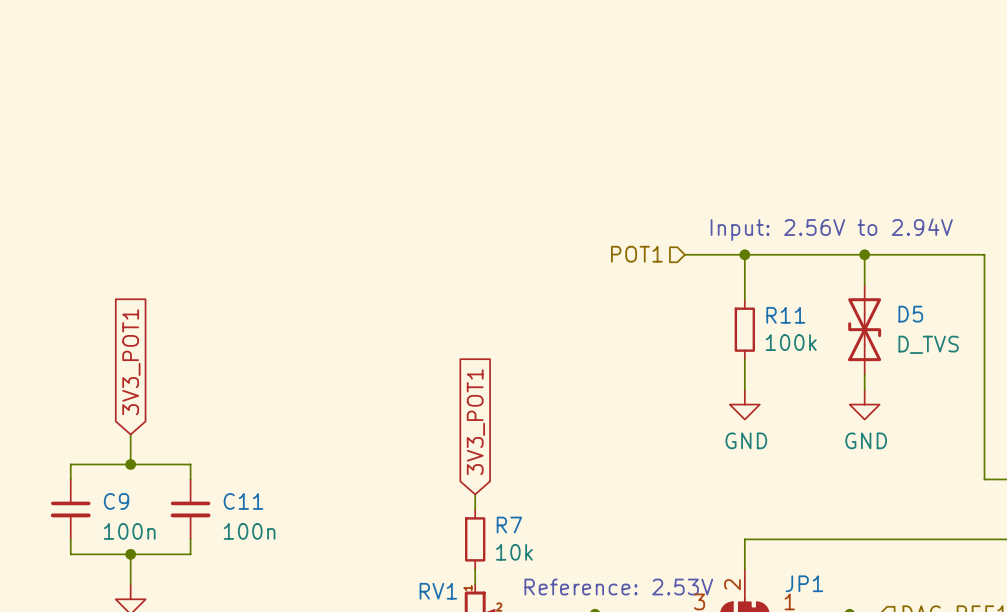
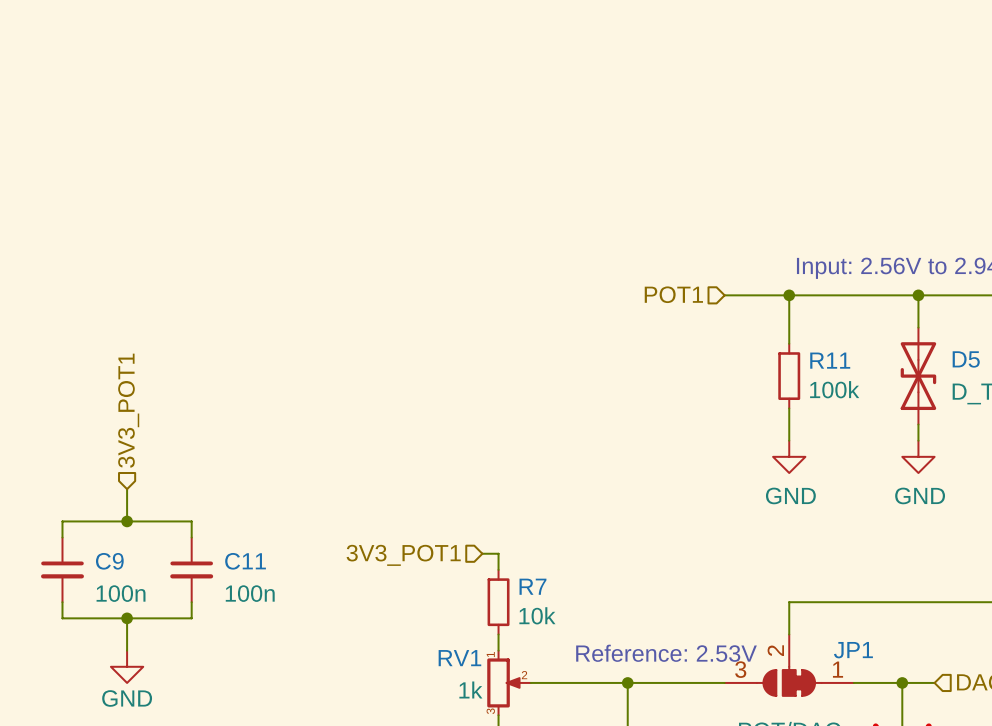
hierarchical label: none -> 3V3_POT1 (128, 410)
global label: 3V3_POT1 (131, 362) -> none
global label: 3V3_POT1 (475, 422) -> none
hierarchical label: none -> 3V3_POT1 (403, 555)
wire: none -> (482, 553) (498, 553)

